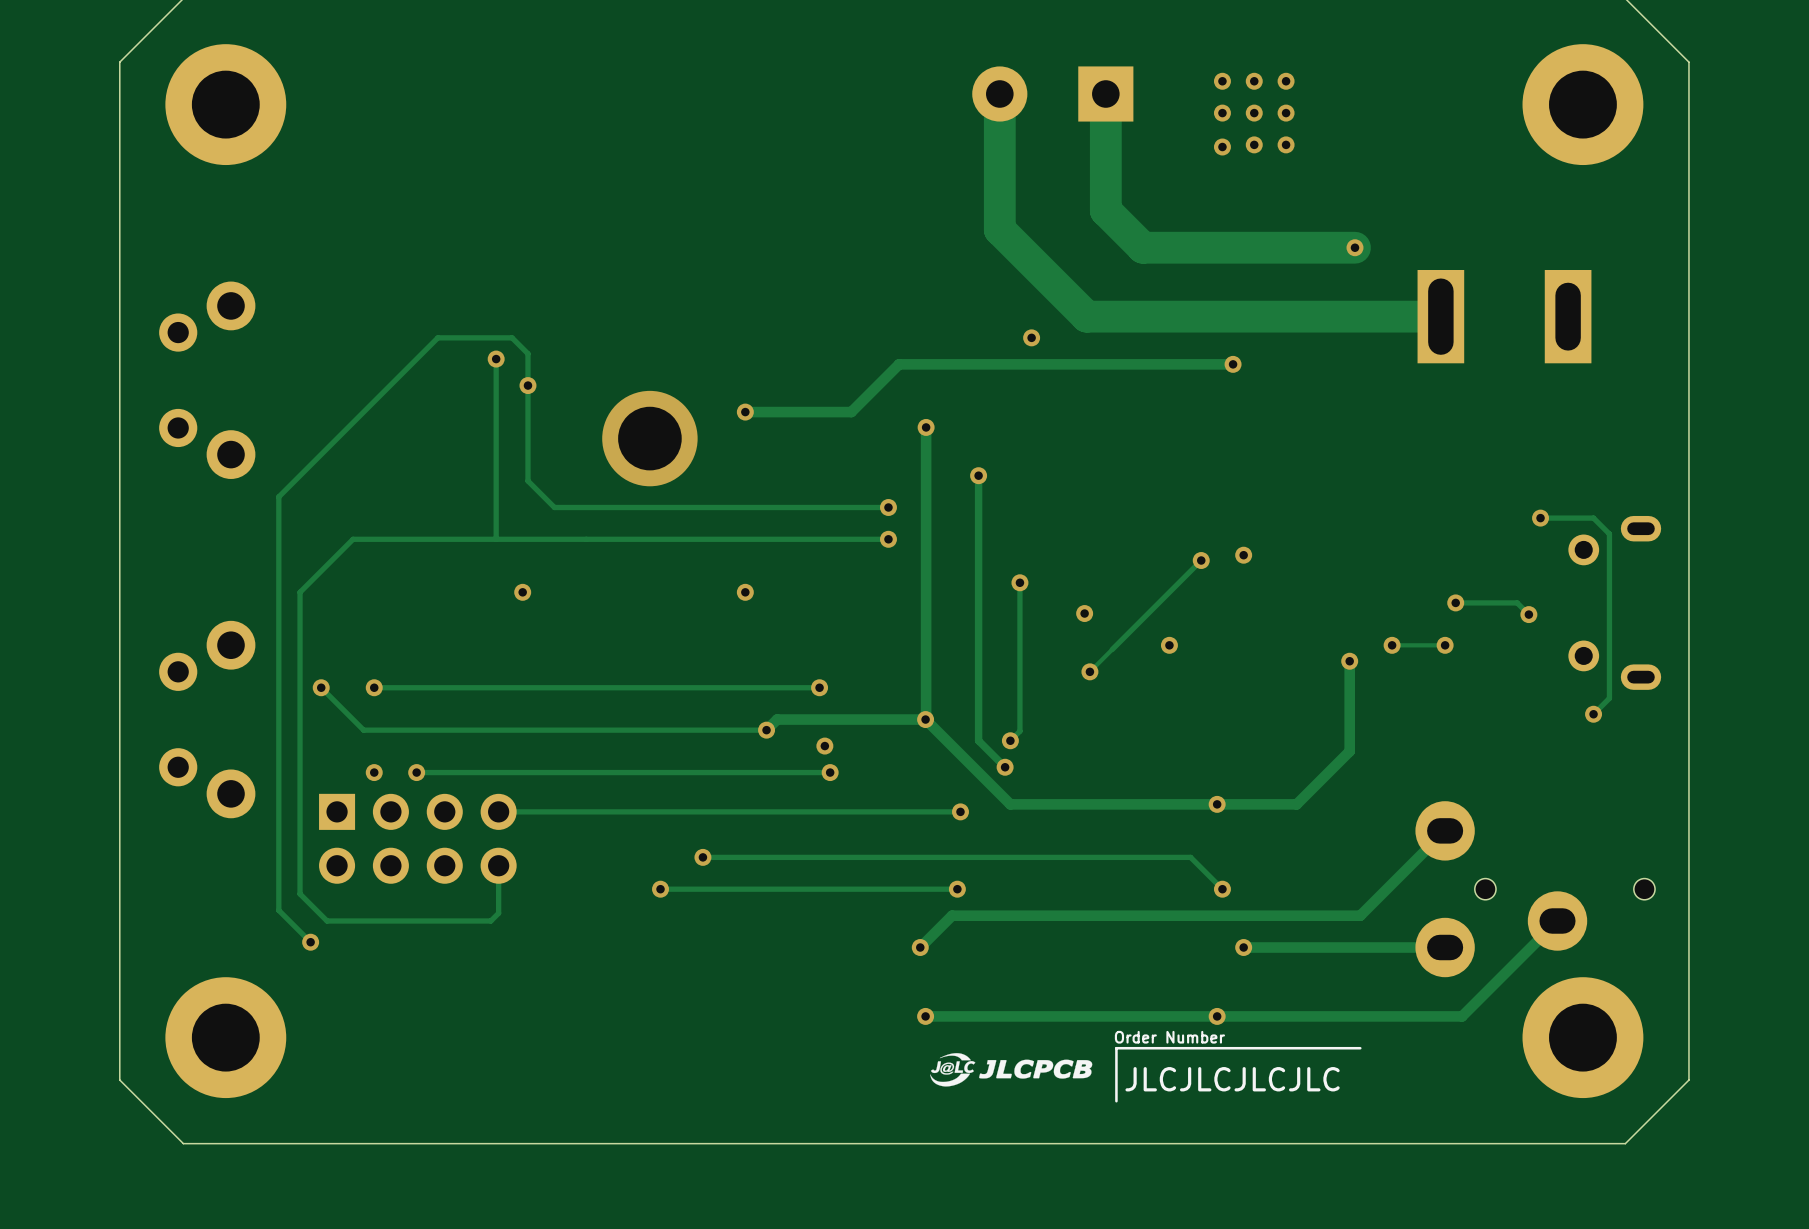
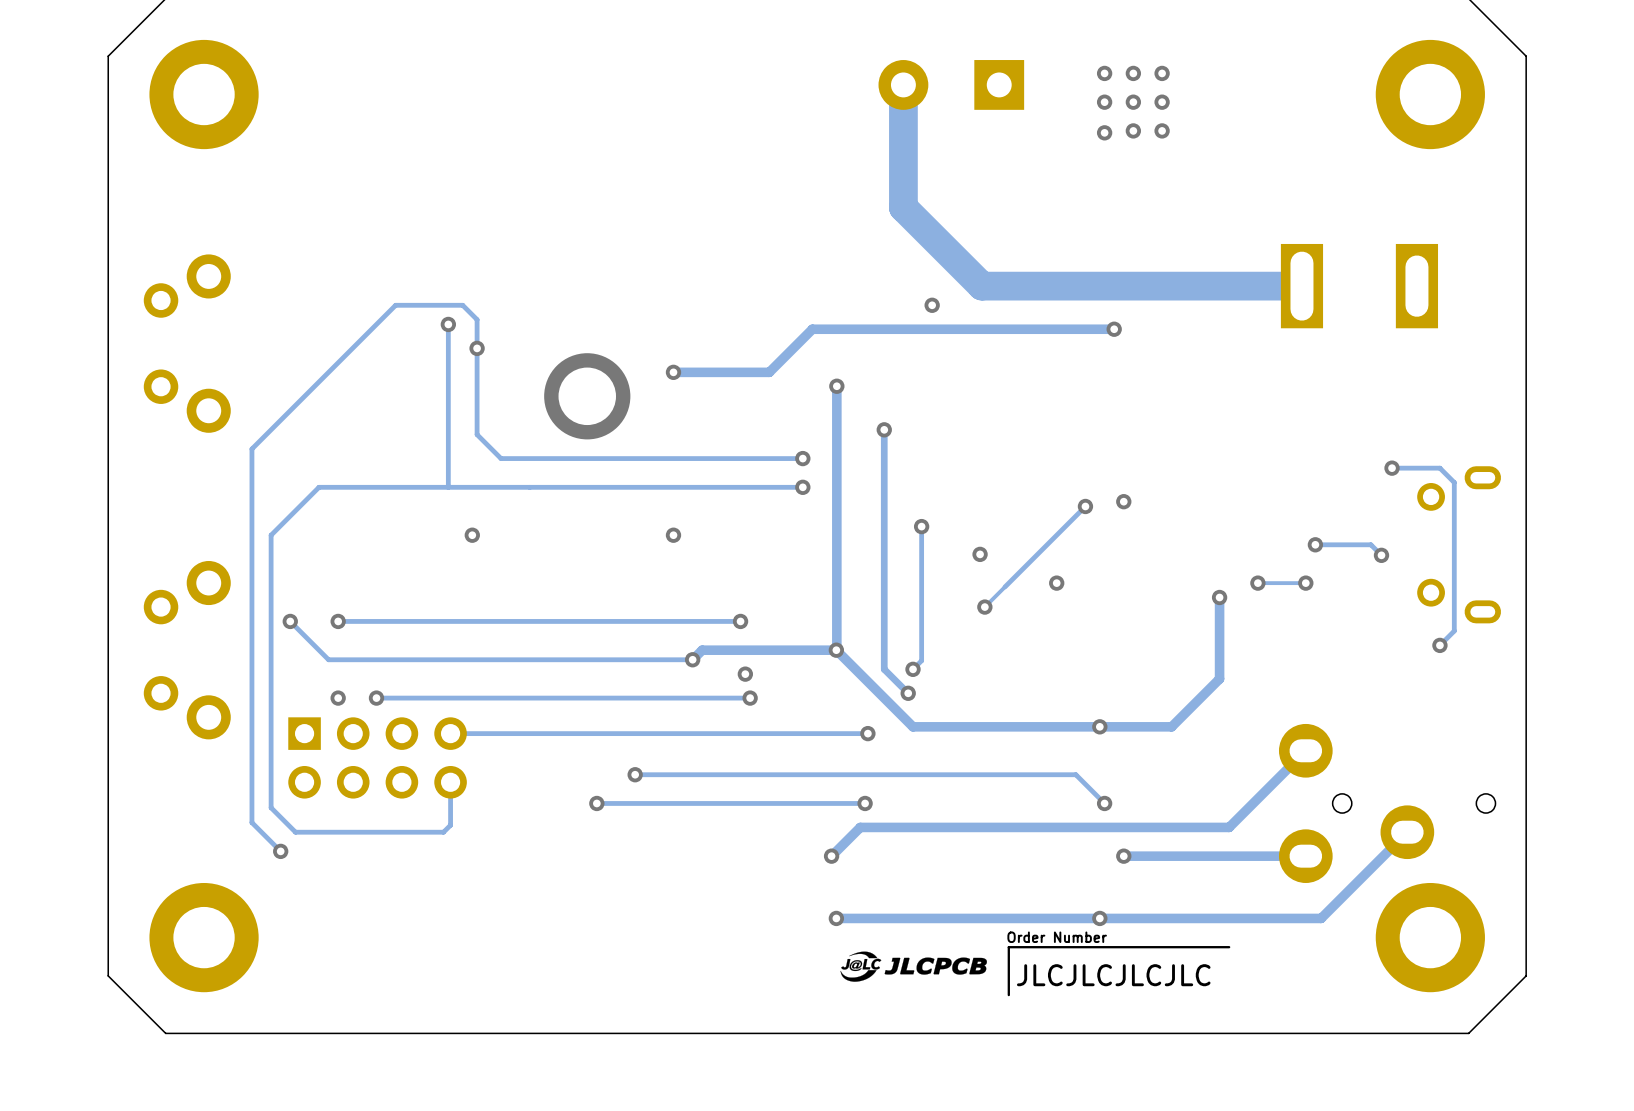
track: (1105, 93) (1105, 210) (1142, 247) (1354, 247) -> none
via: (1354, 247) -> none

